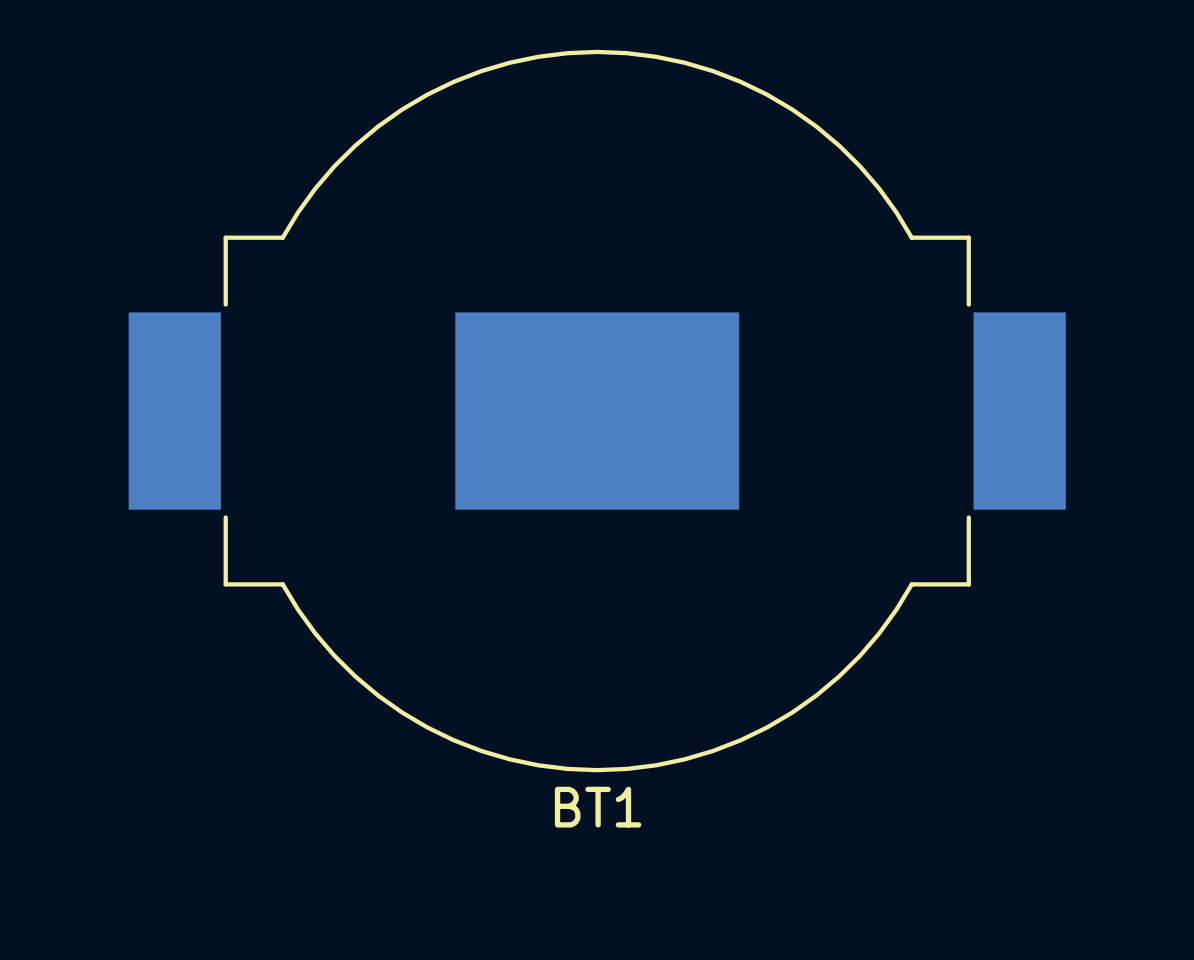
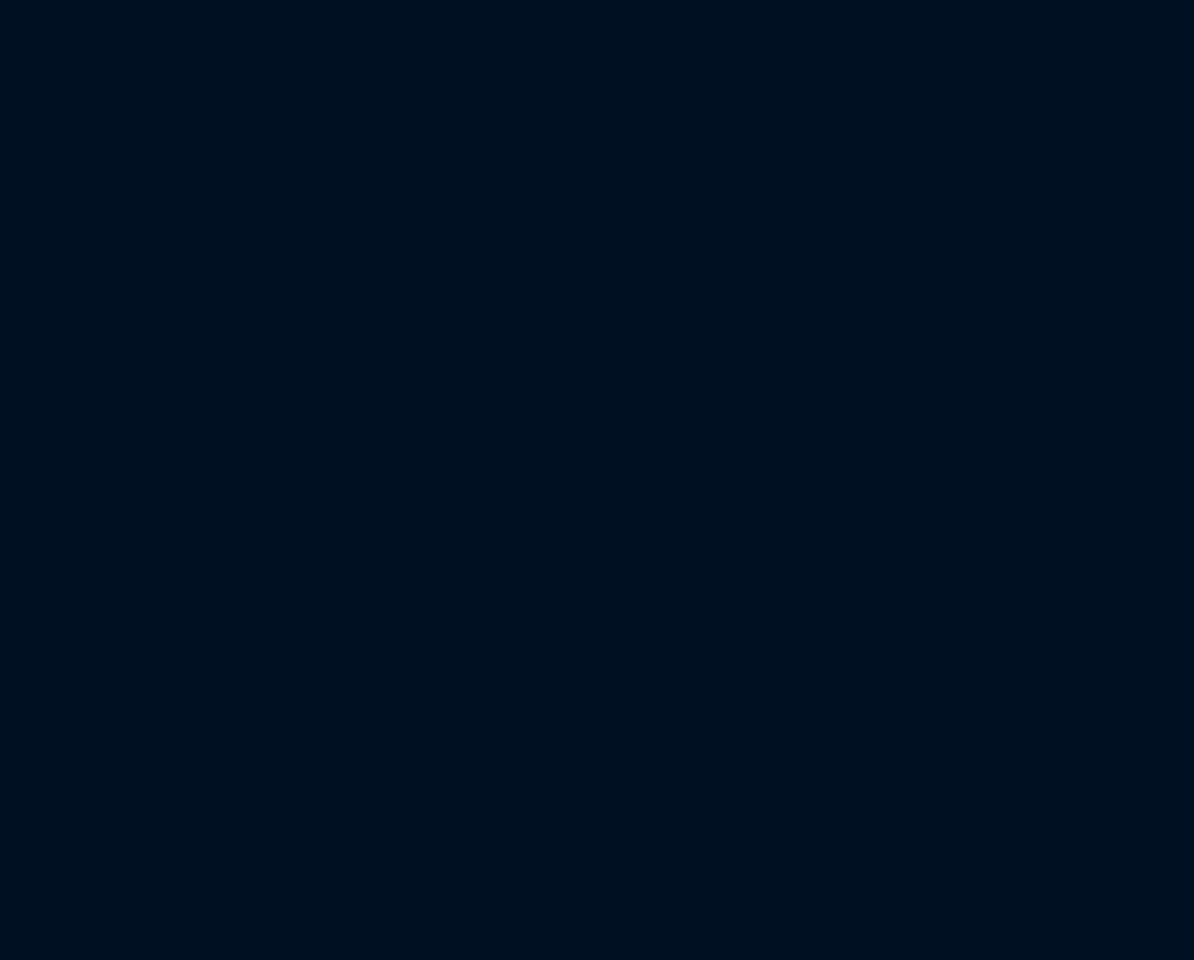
BT1: (597, 411) -> none

